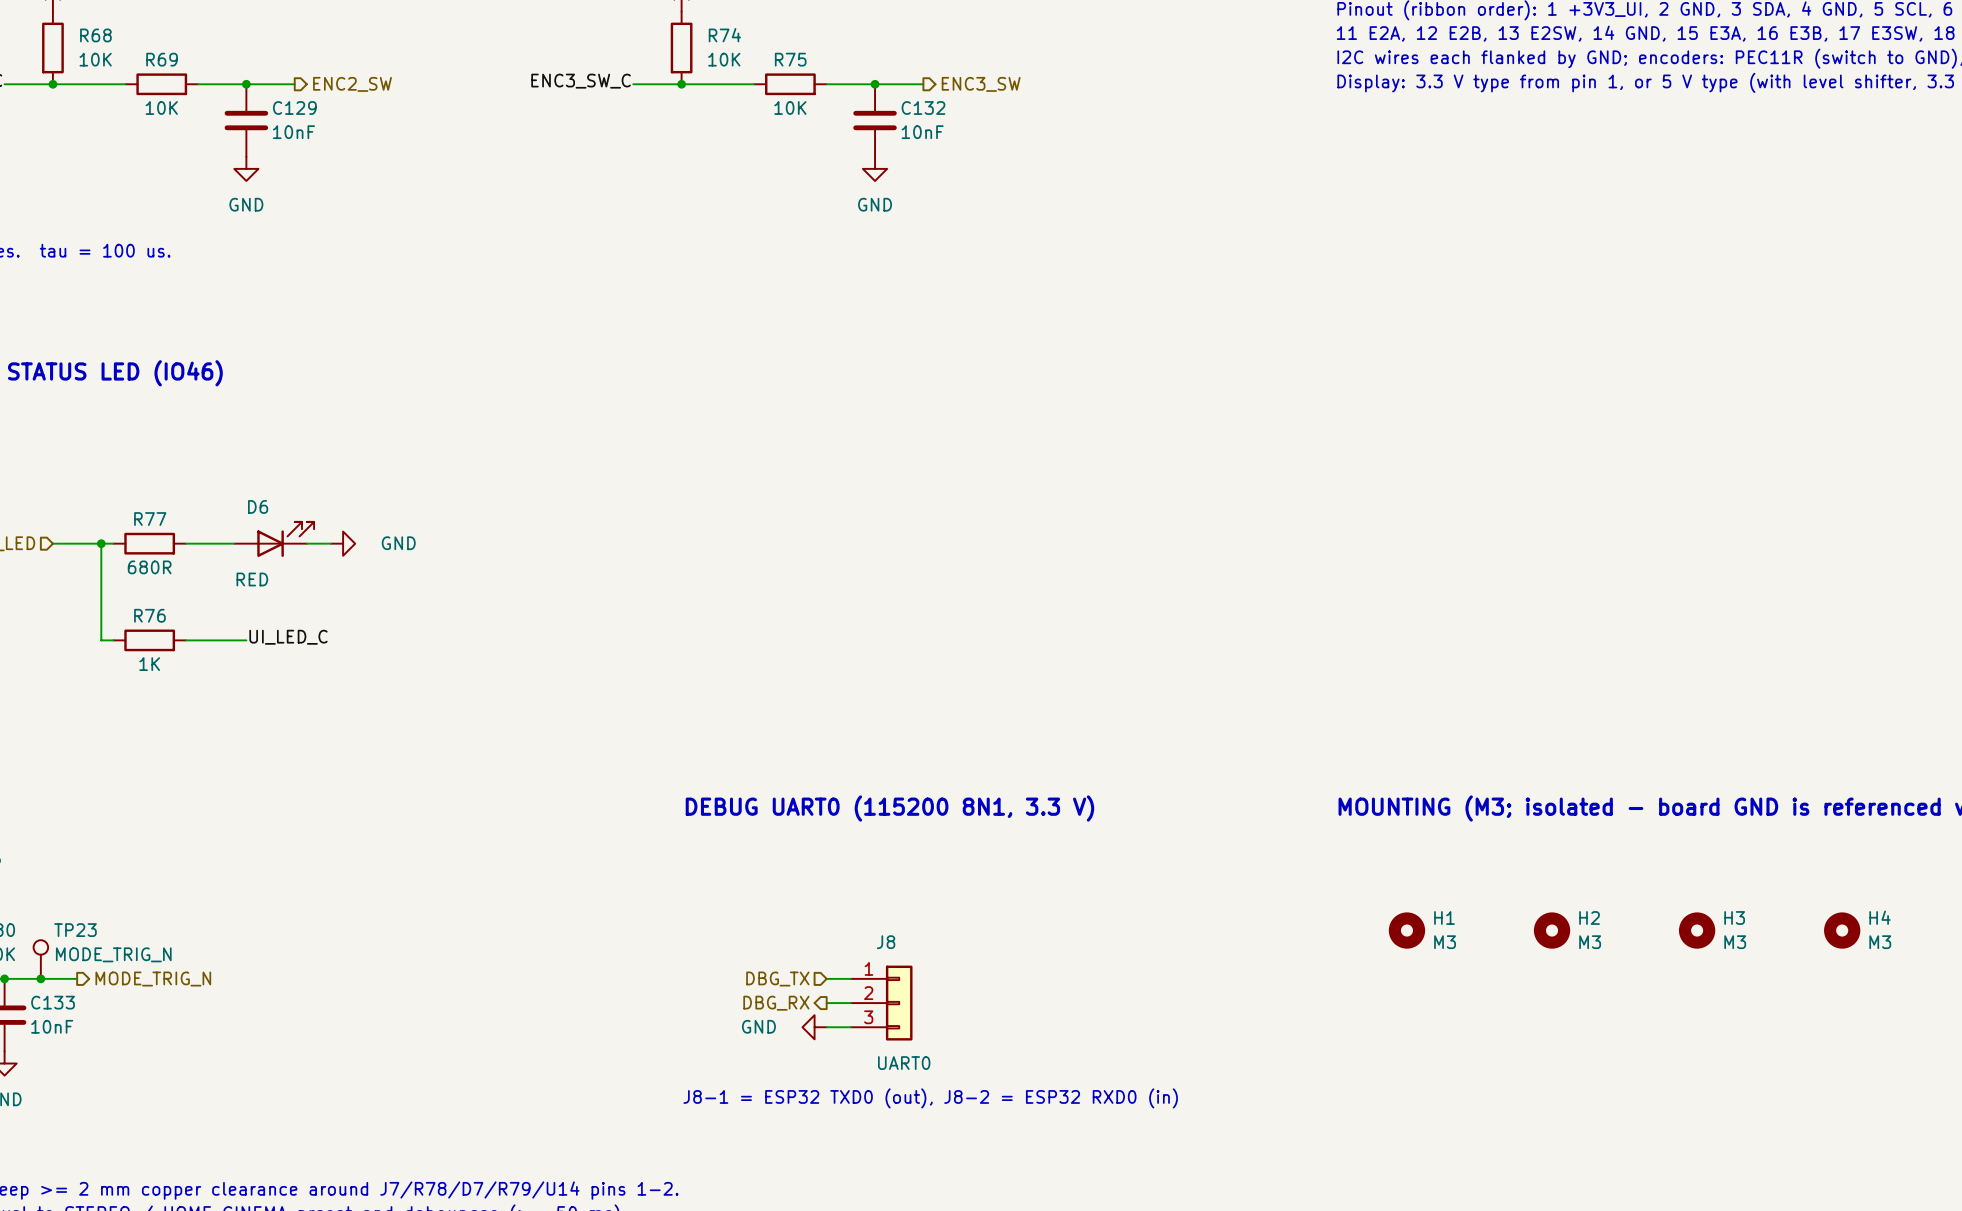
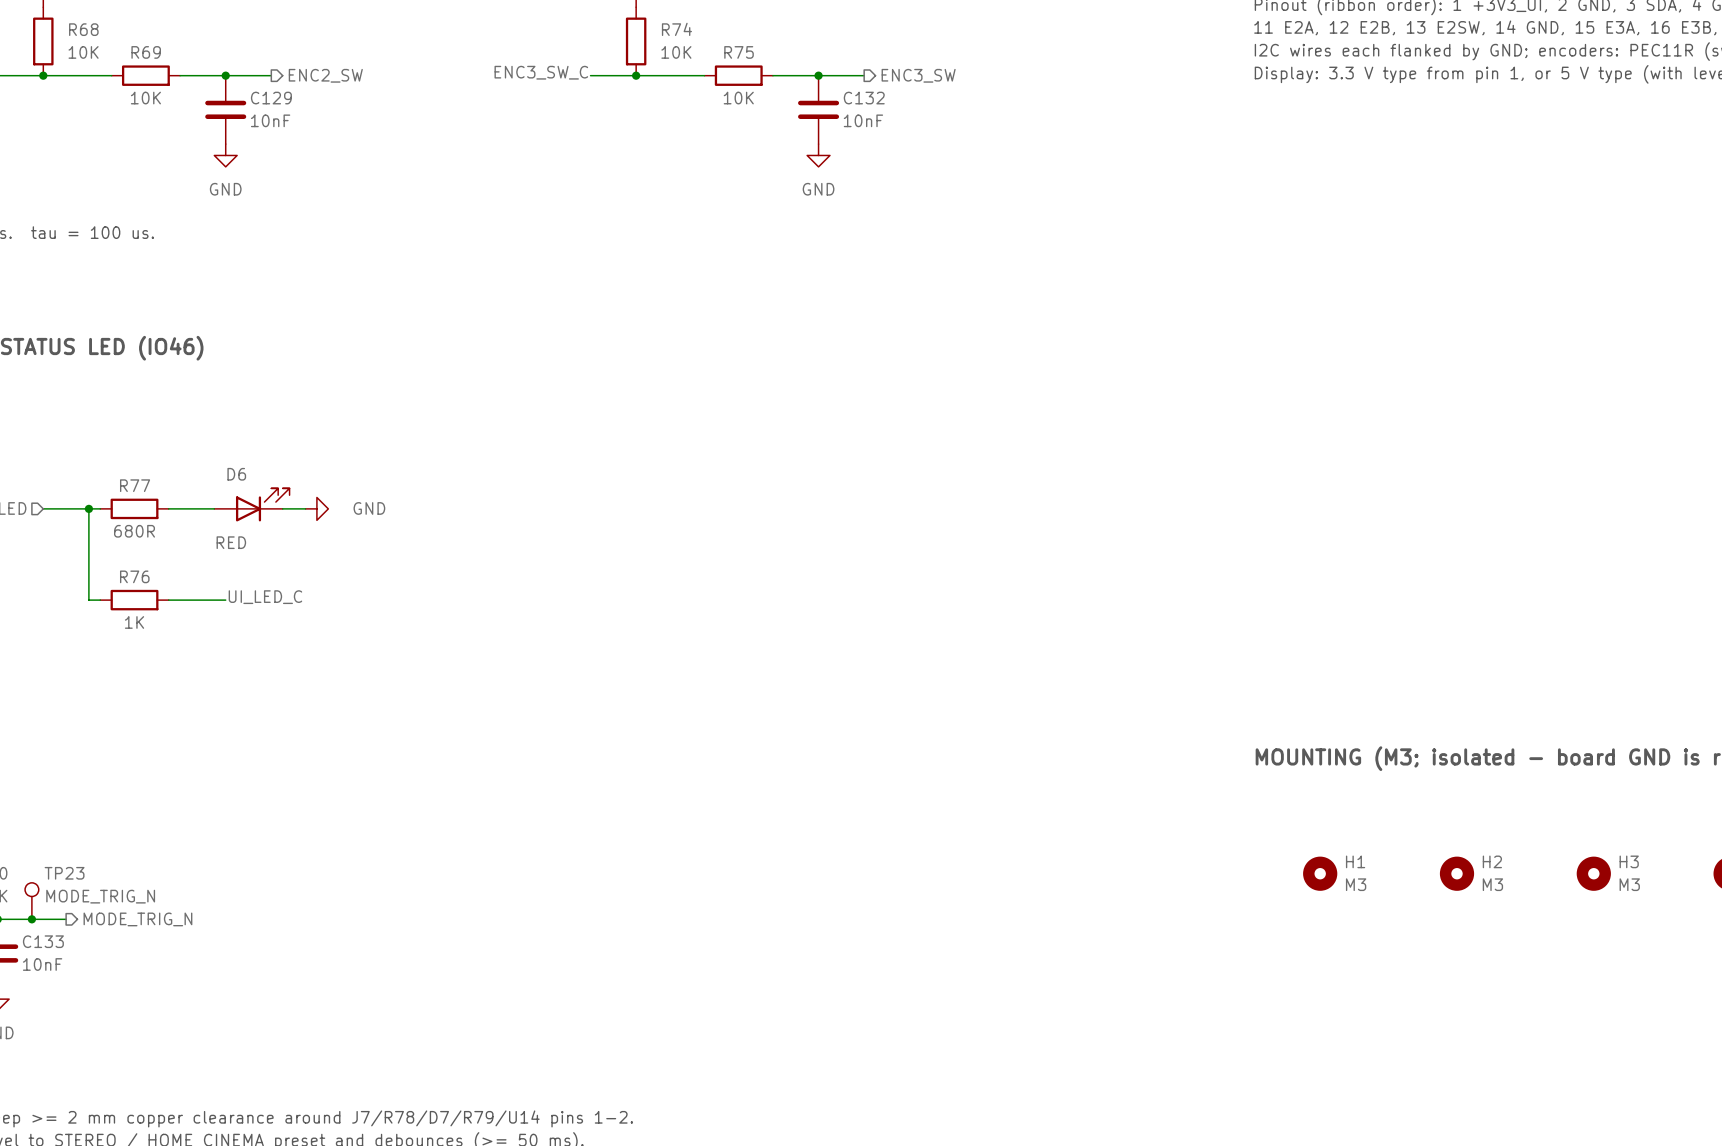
text: DEBUG UART0 (115200 8N1, 3.3 V) (889, 808) -> none
wire: (826, 978) (850, 978) -> none
hierarchical label: DBG_TX (777, 979) -> none
hierarchical label: DBG_RX (776, 1003) -> none
wire: (826, 1003) (850, 1003) -> none
J8: UART0 (881, 1003) -> none
power symbol: GND (814, 1027) -> none
wire: (826, 1027) (850, 1027) -> none
text: J8-1 = ESP32 TXD0 (out), J8-2 = ESP32 RXD0 (in) (930, 1098) -> none

